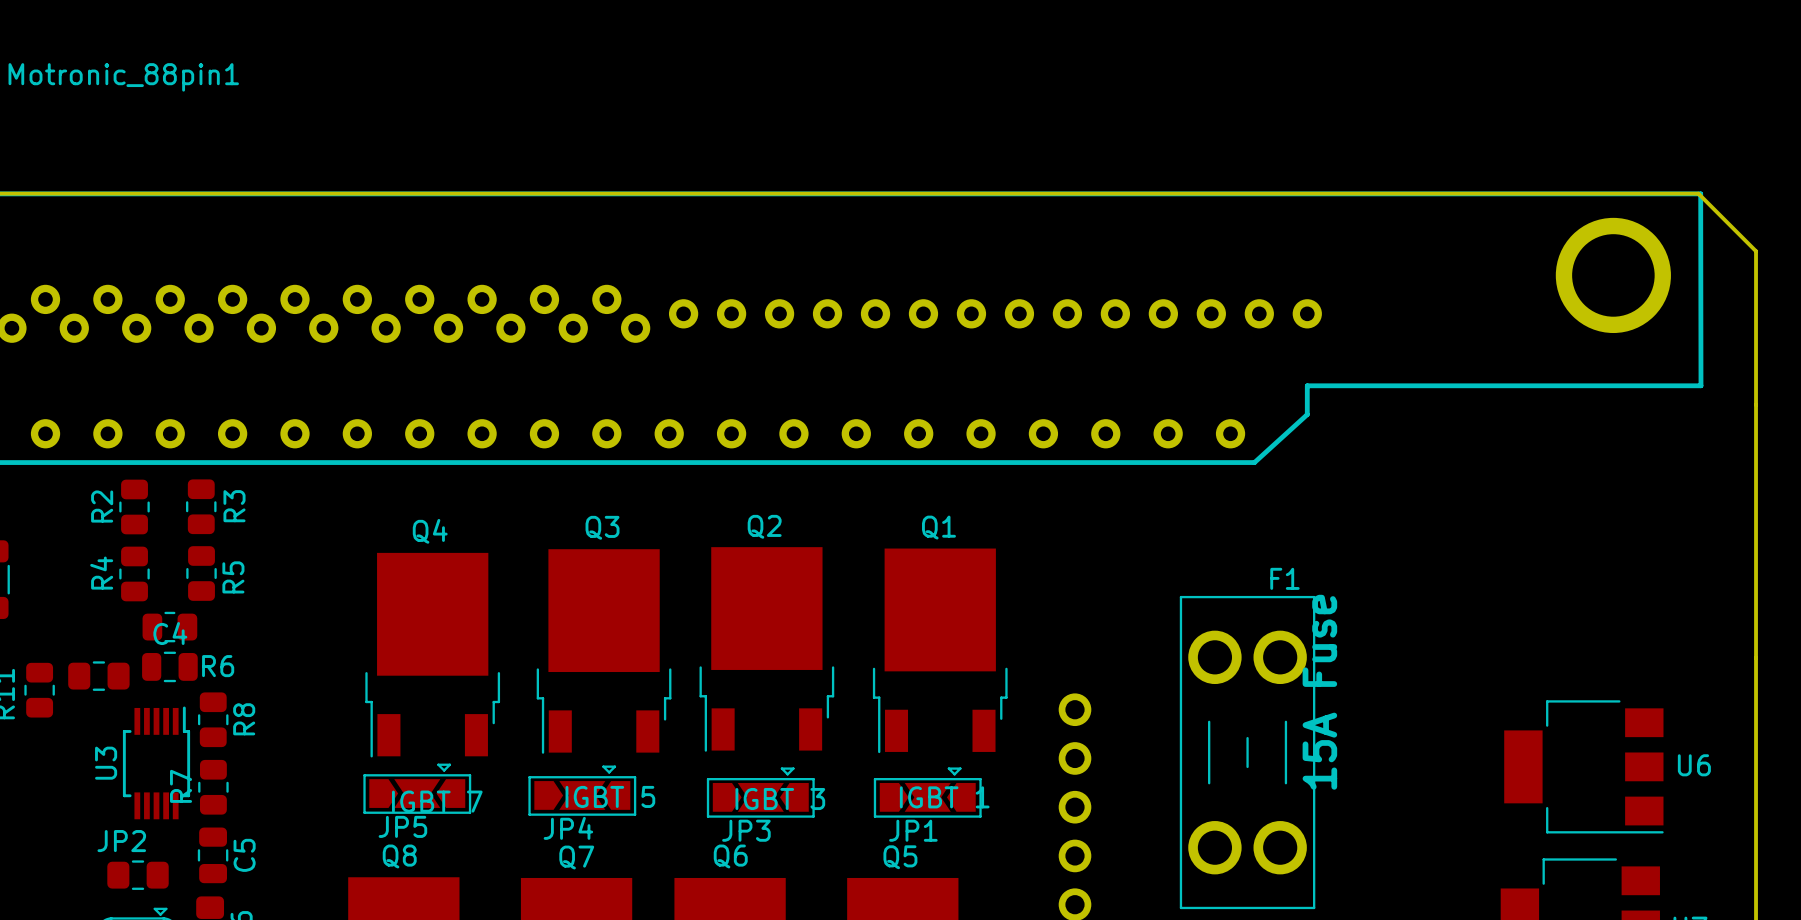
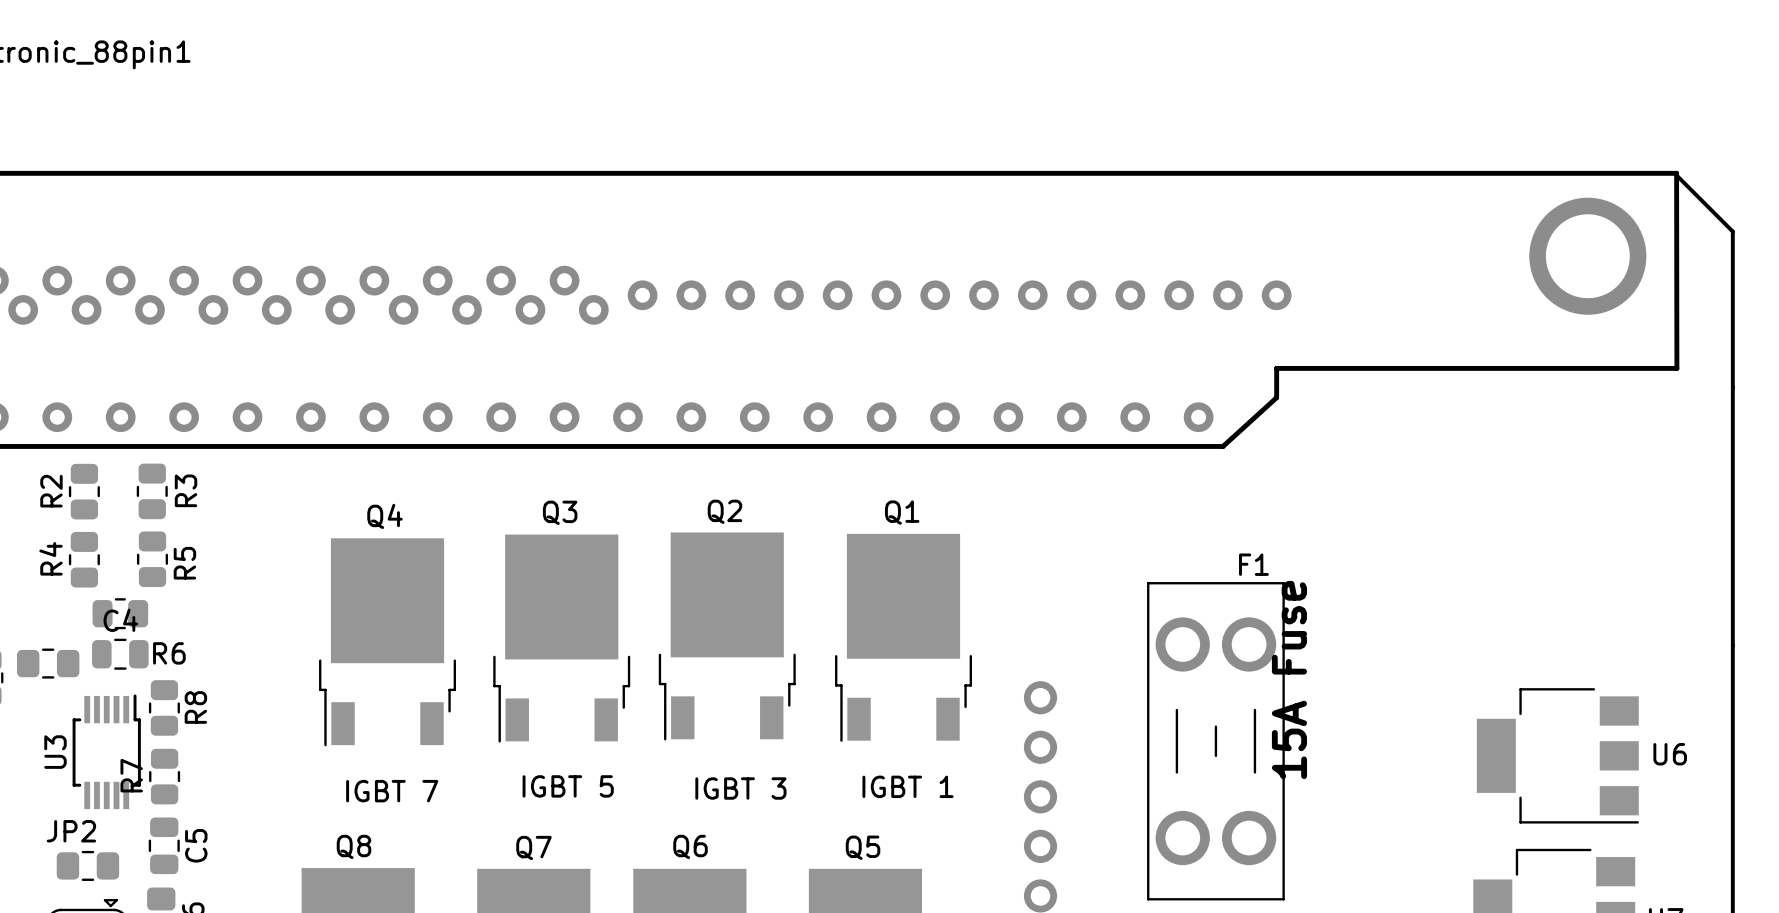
JP5: (417, 788) -> none
JP4: (582, 790) -> none
JP3: (760, 792) -> none
JP1: (927, 792) -> none

